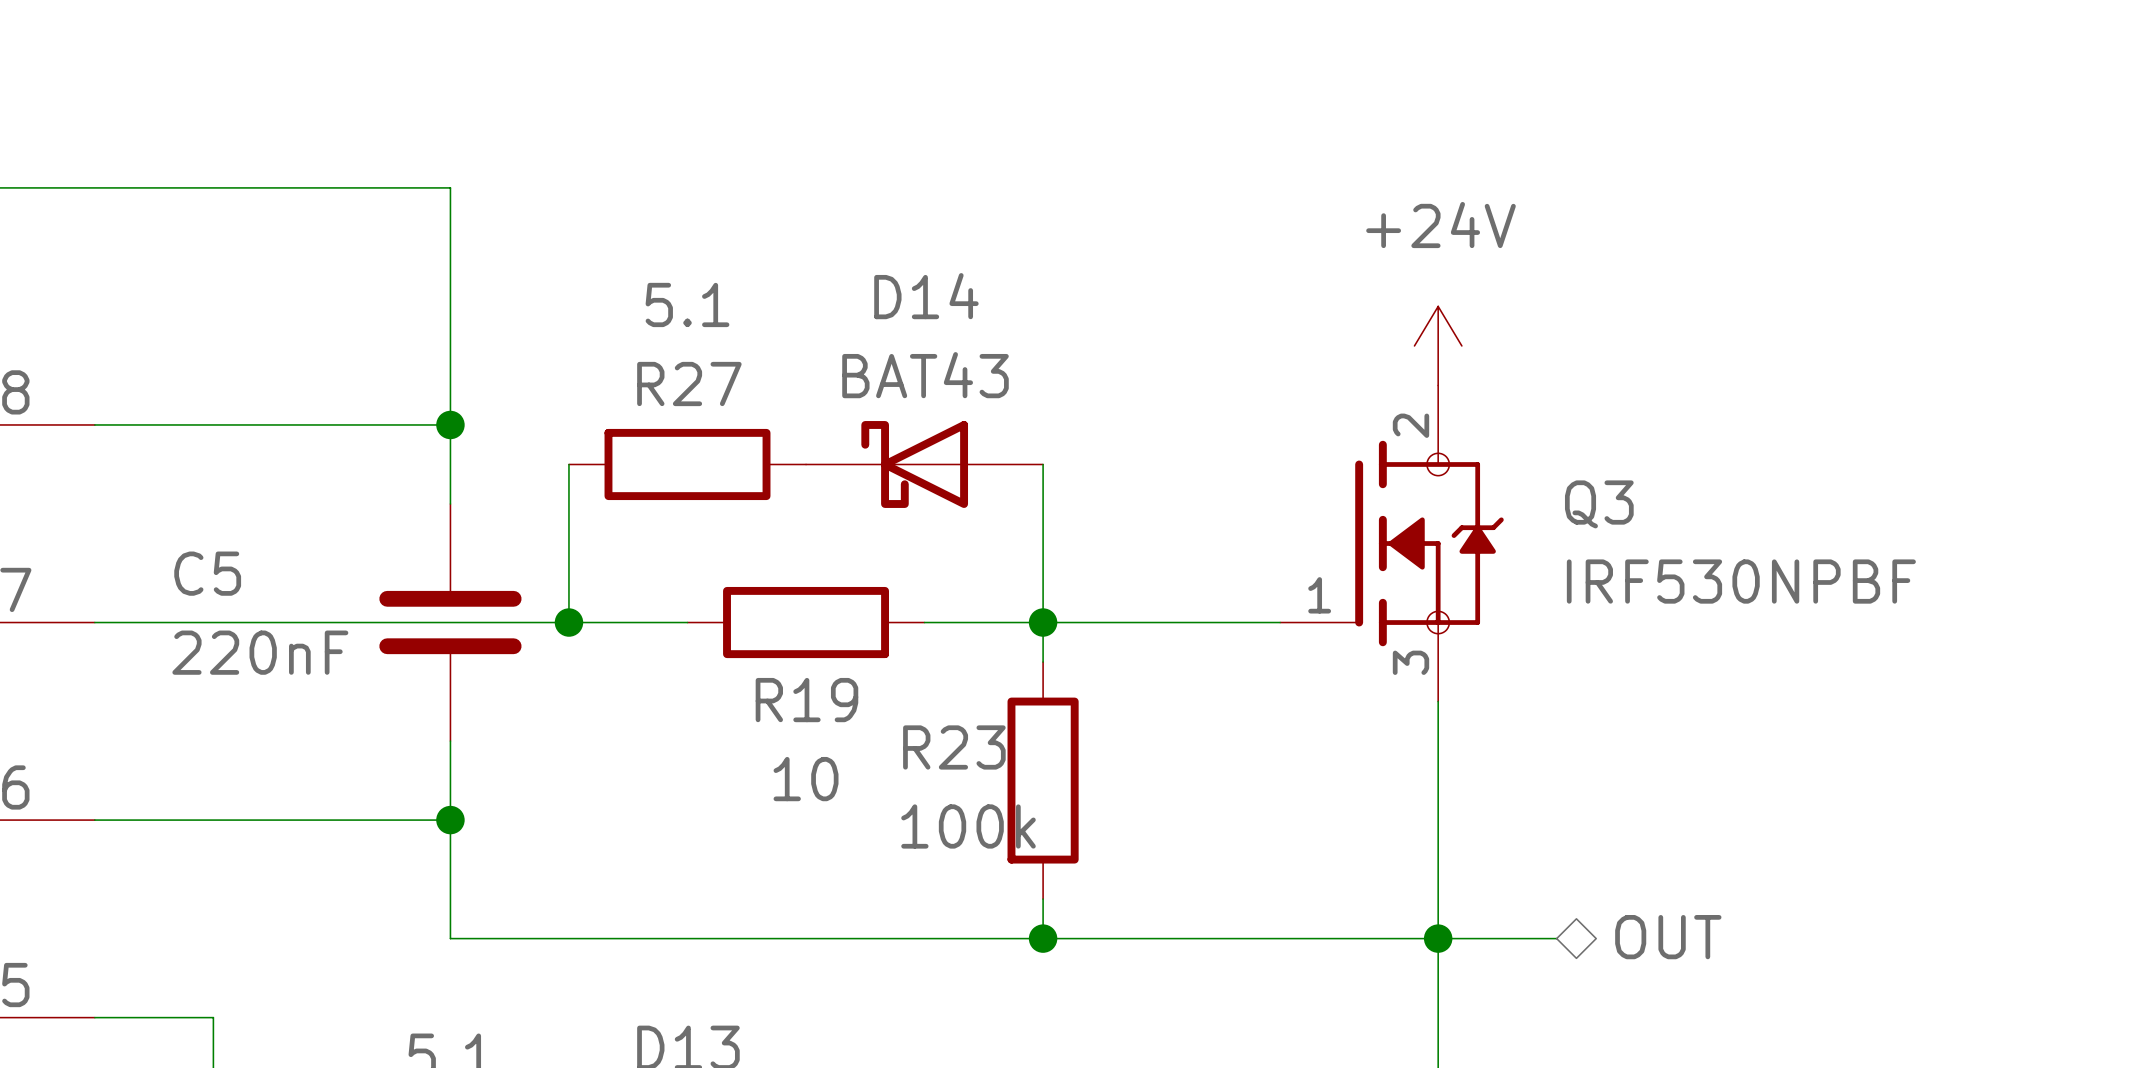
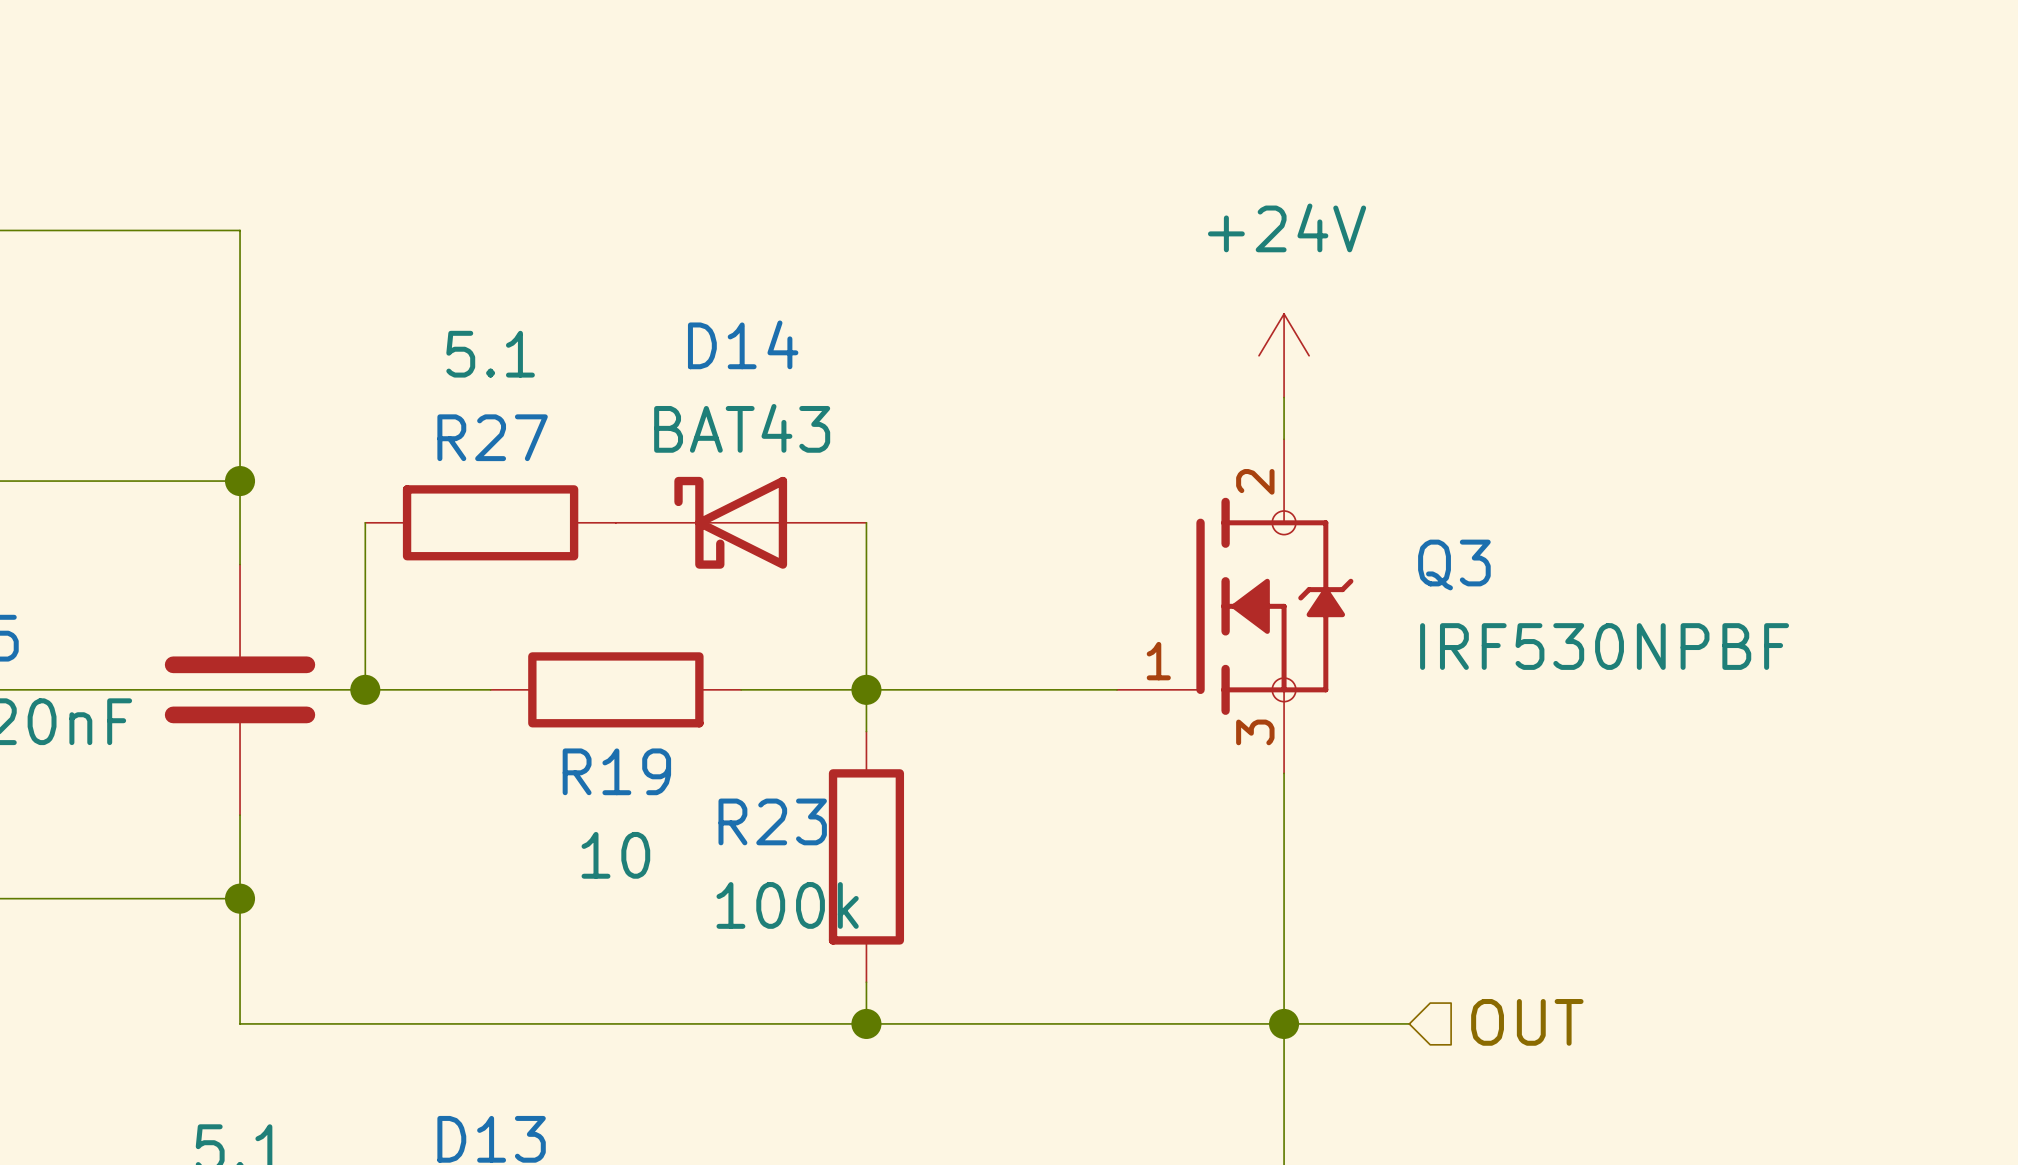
power symbol position: +24V (1438, 345) -> +24V (1284, 355)
hierarchical label shape: bidirectional (1668, 937) -> input (1527, 1022)

